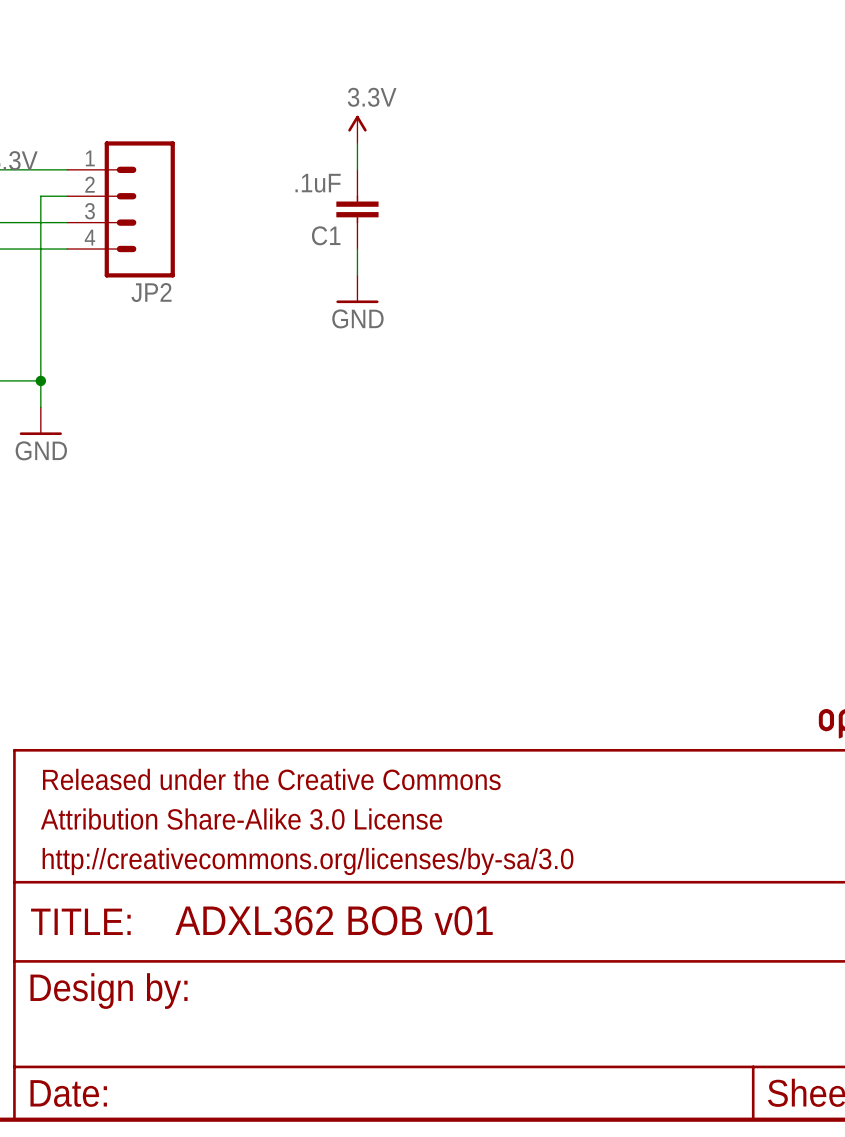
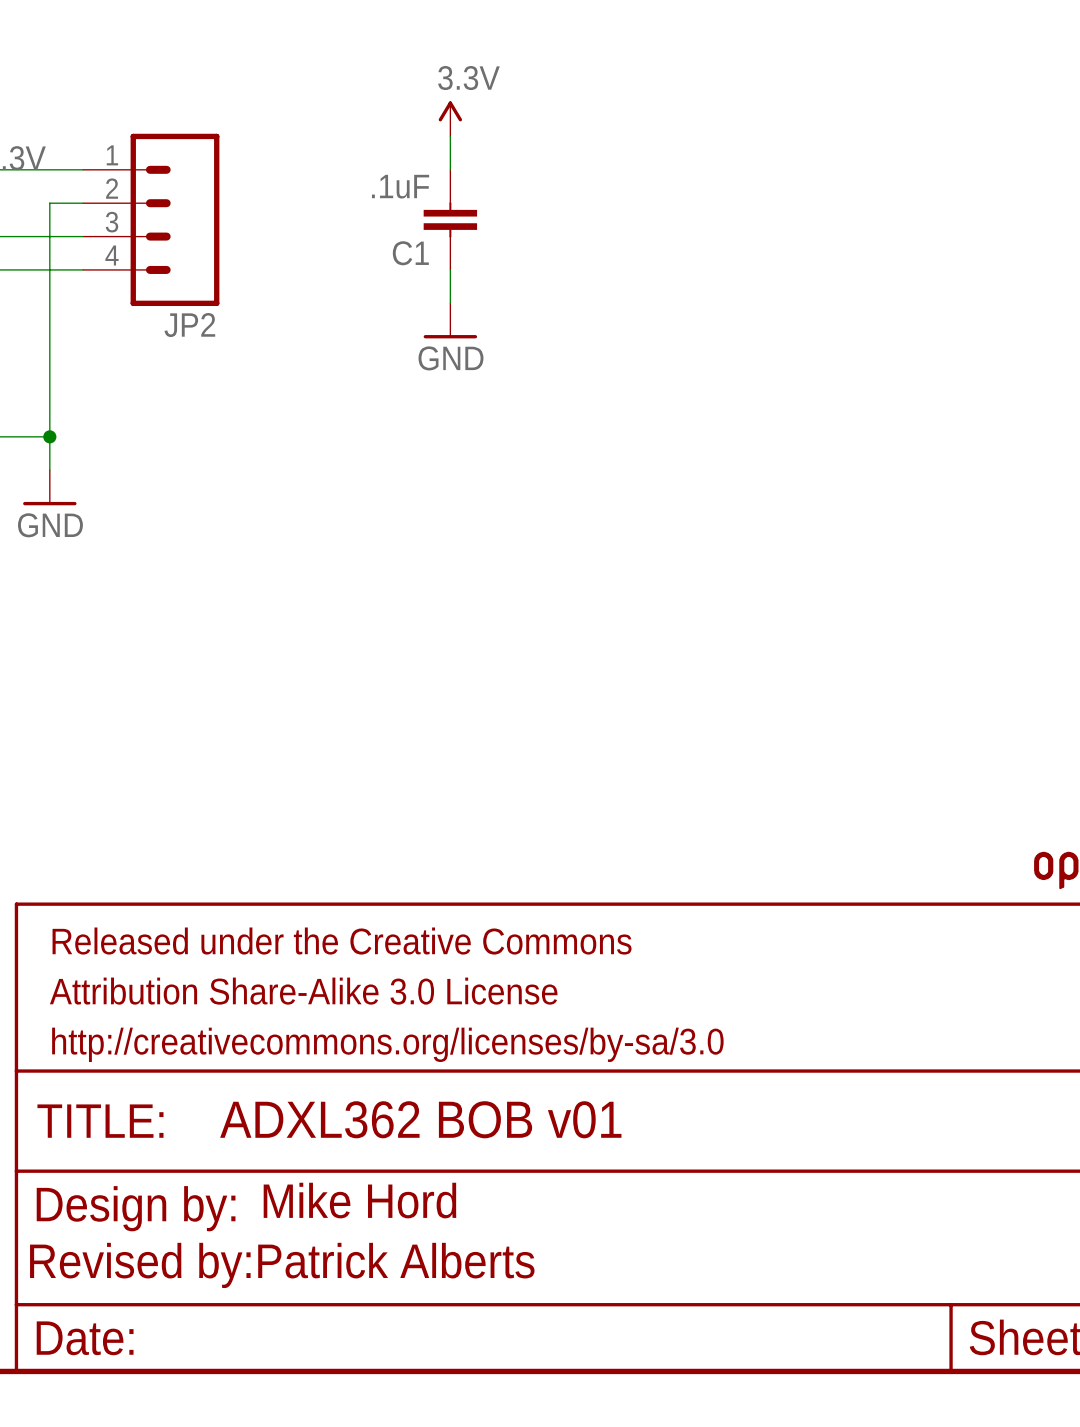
text: none -> Mike Hord (359, 1200)
text: none -> Revised by:Patrick Alberts (282, 1265)

